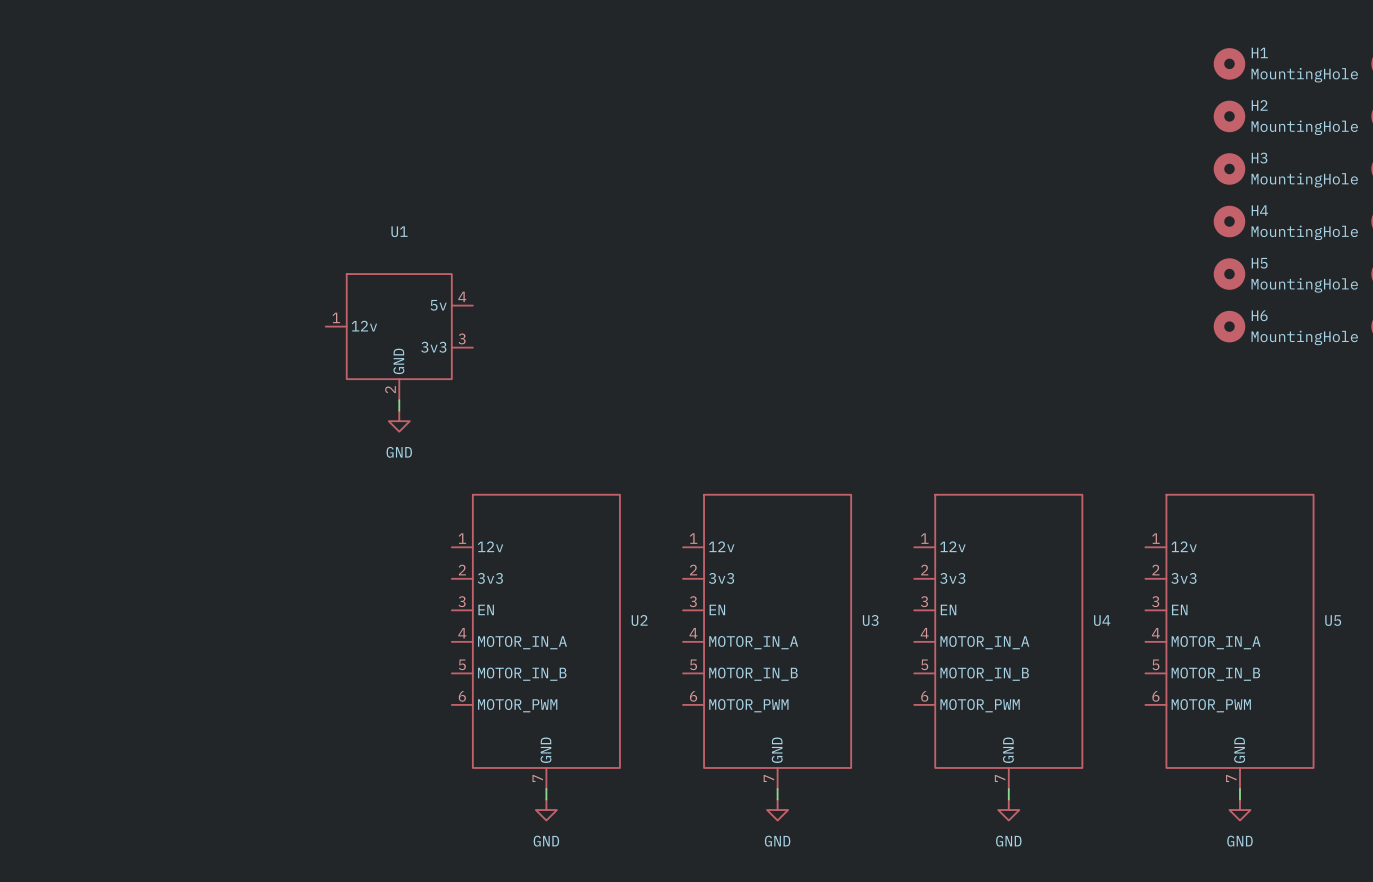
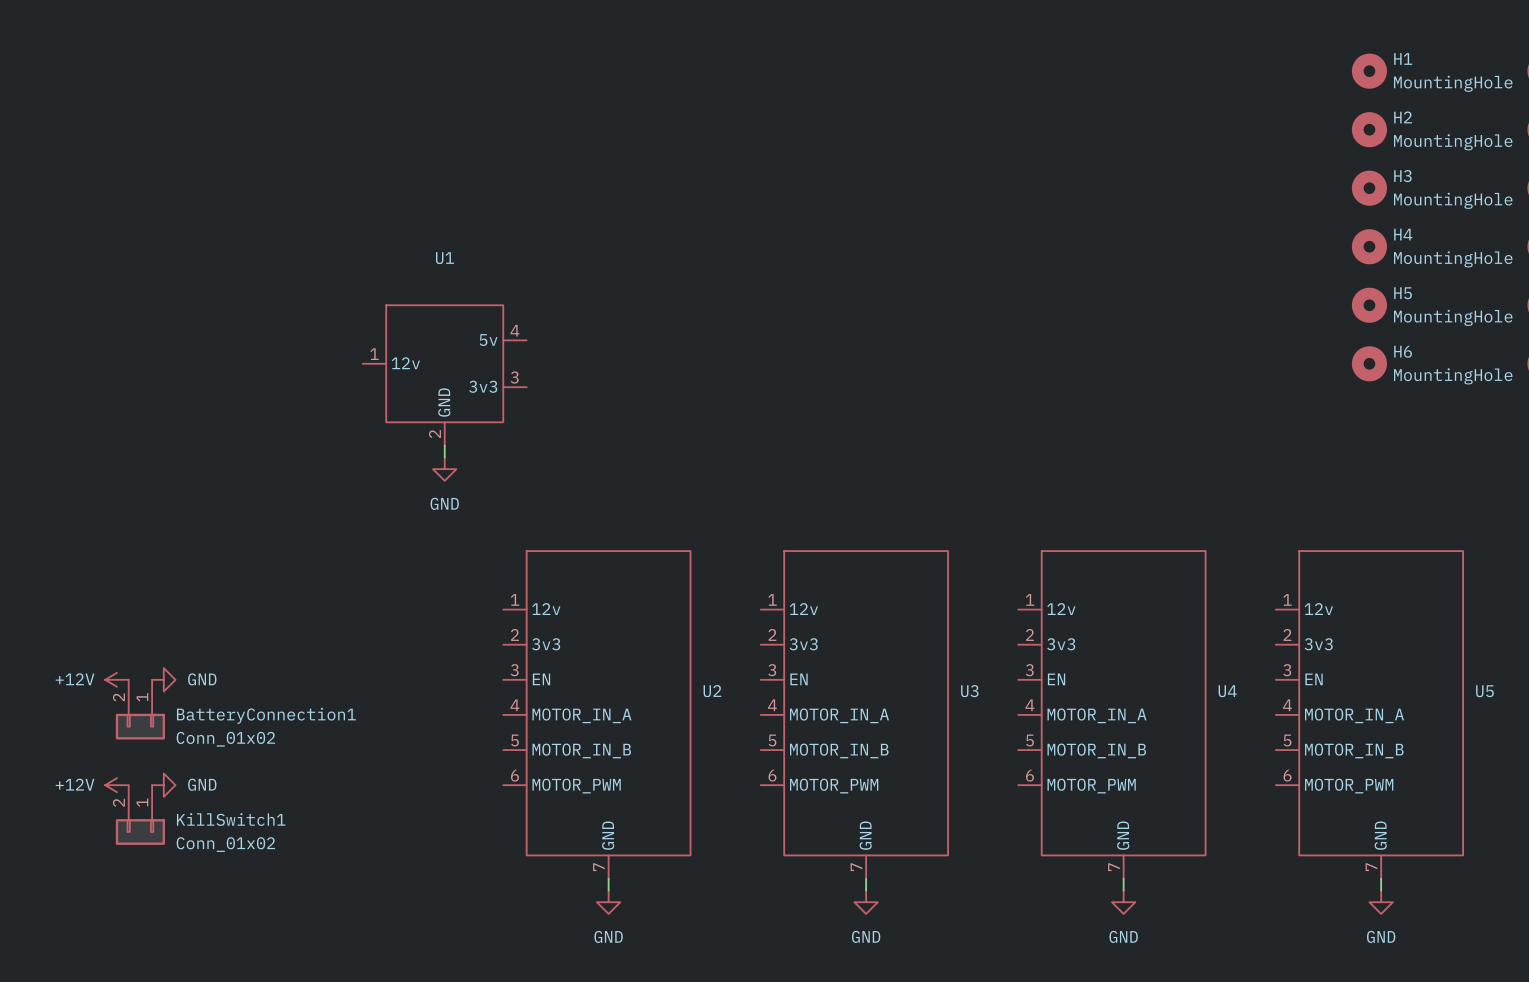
power symbol: none -> +12V (116, 679)
power symbol: none -> GND (163, 679)
BatteryConnection1: none -> Conn_01x02 (140, 709)
power symbol: none -> +12V (116, 785)
power symbol: none -> GND (163, 785)
KillSwitch1: none -> Conn_01x02 (140, 815)

